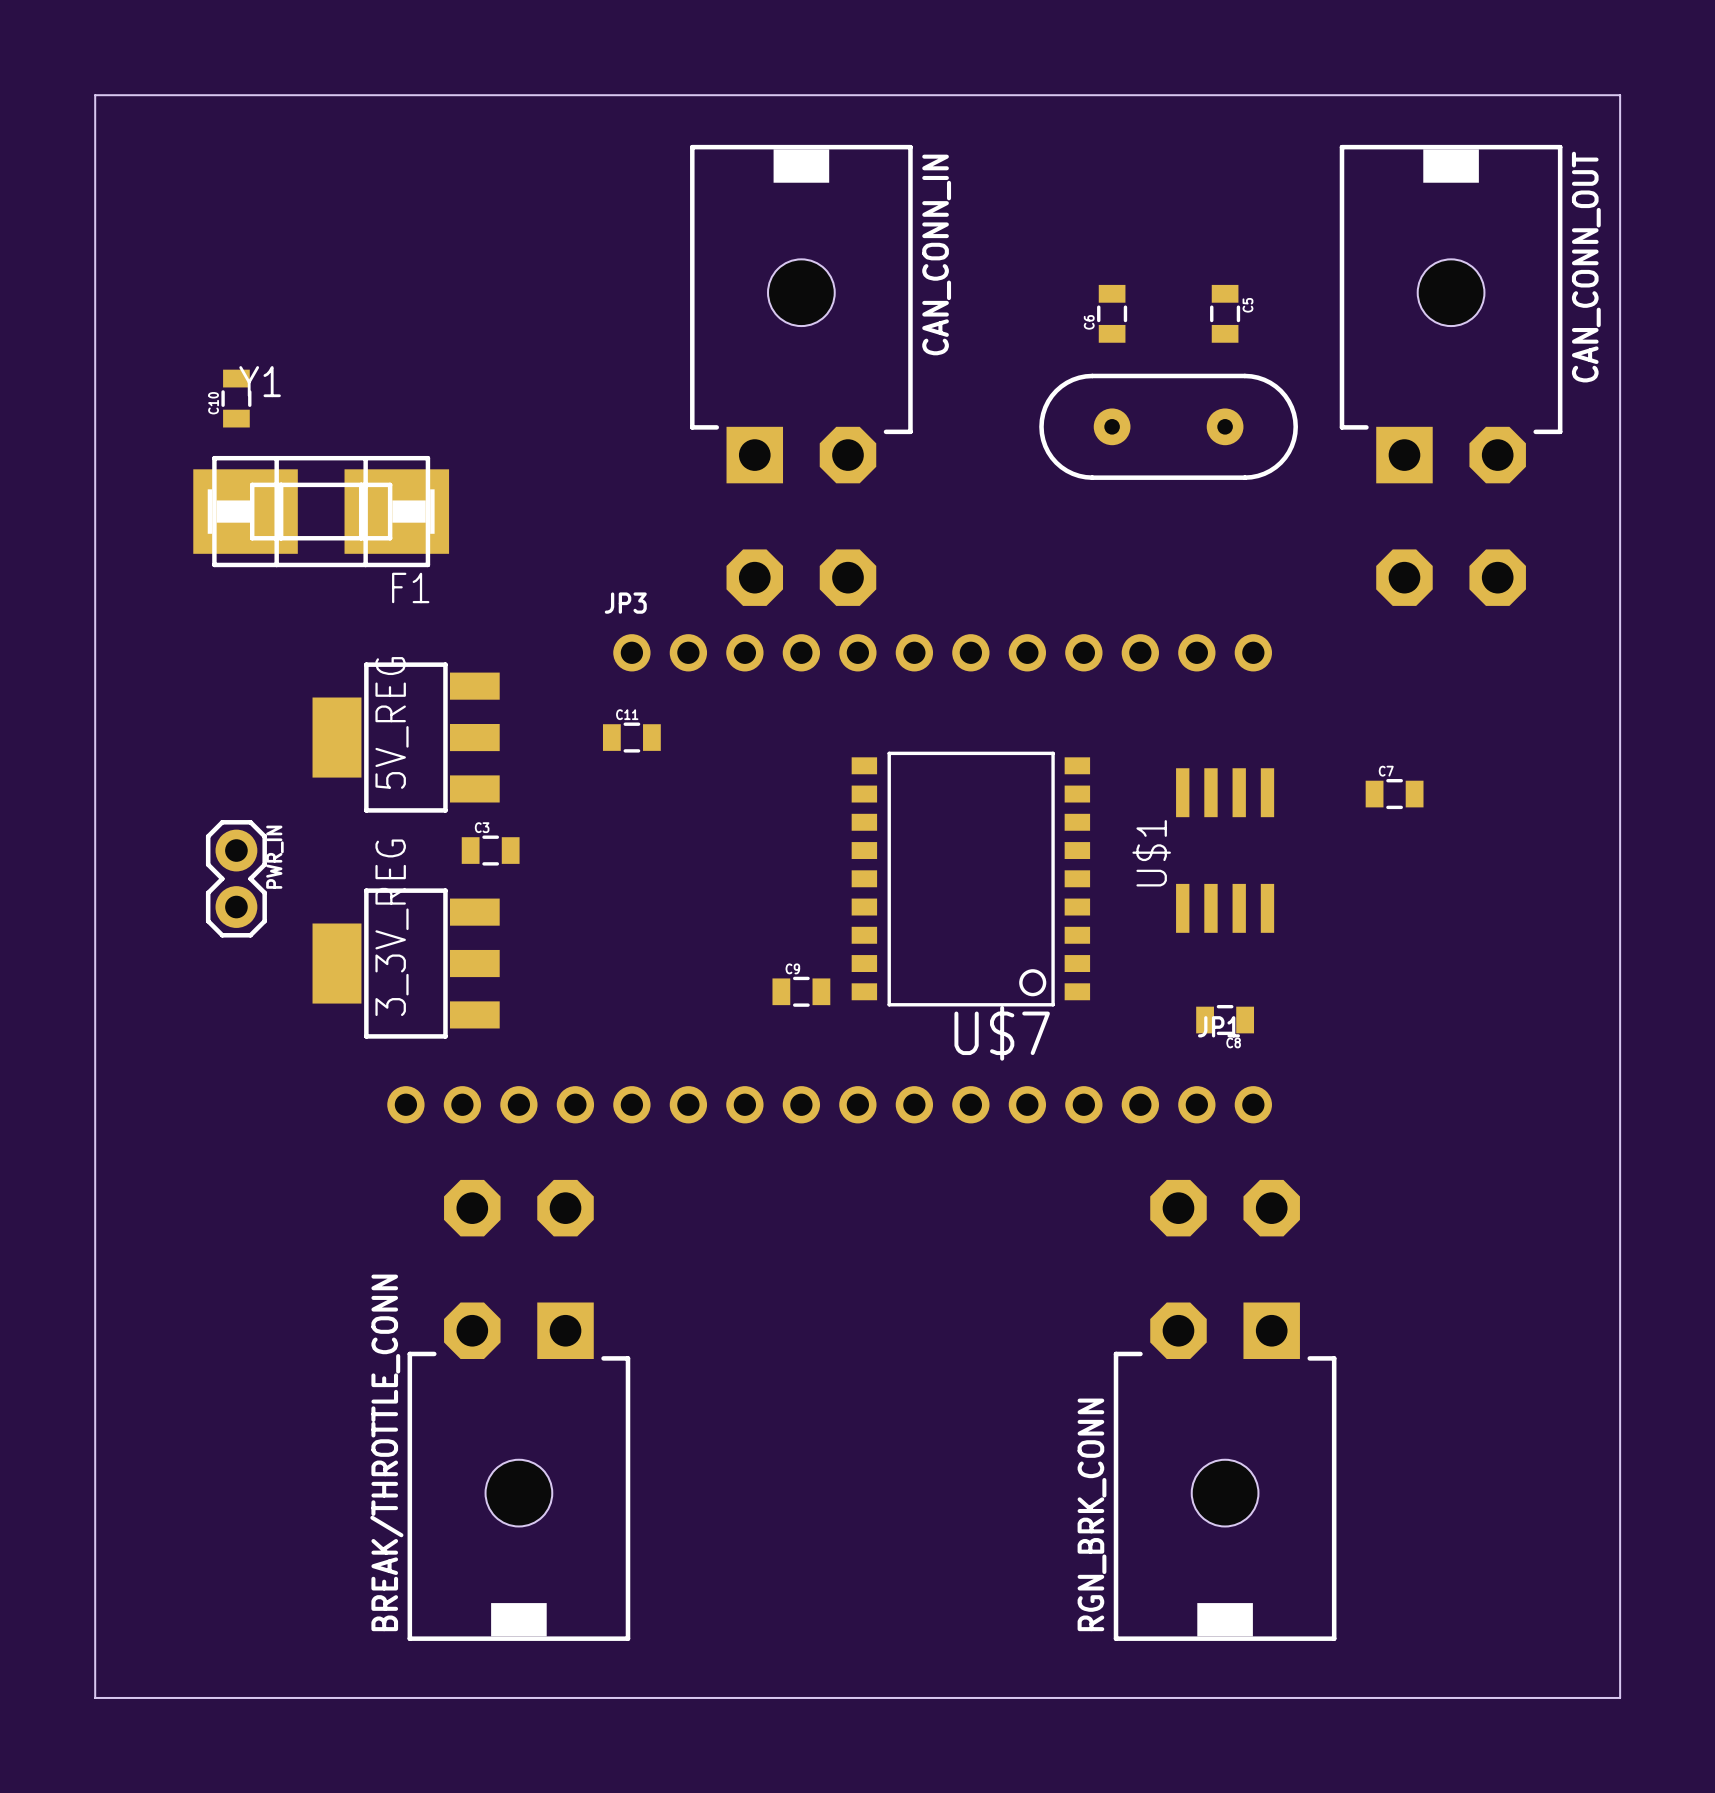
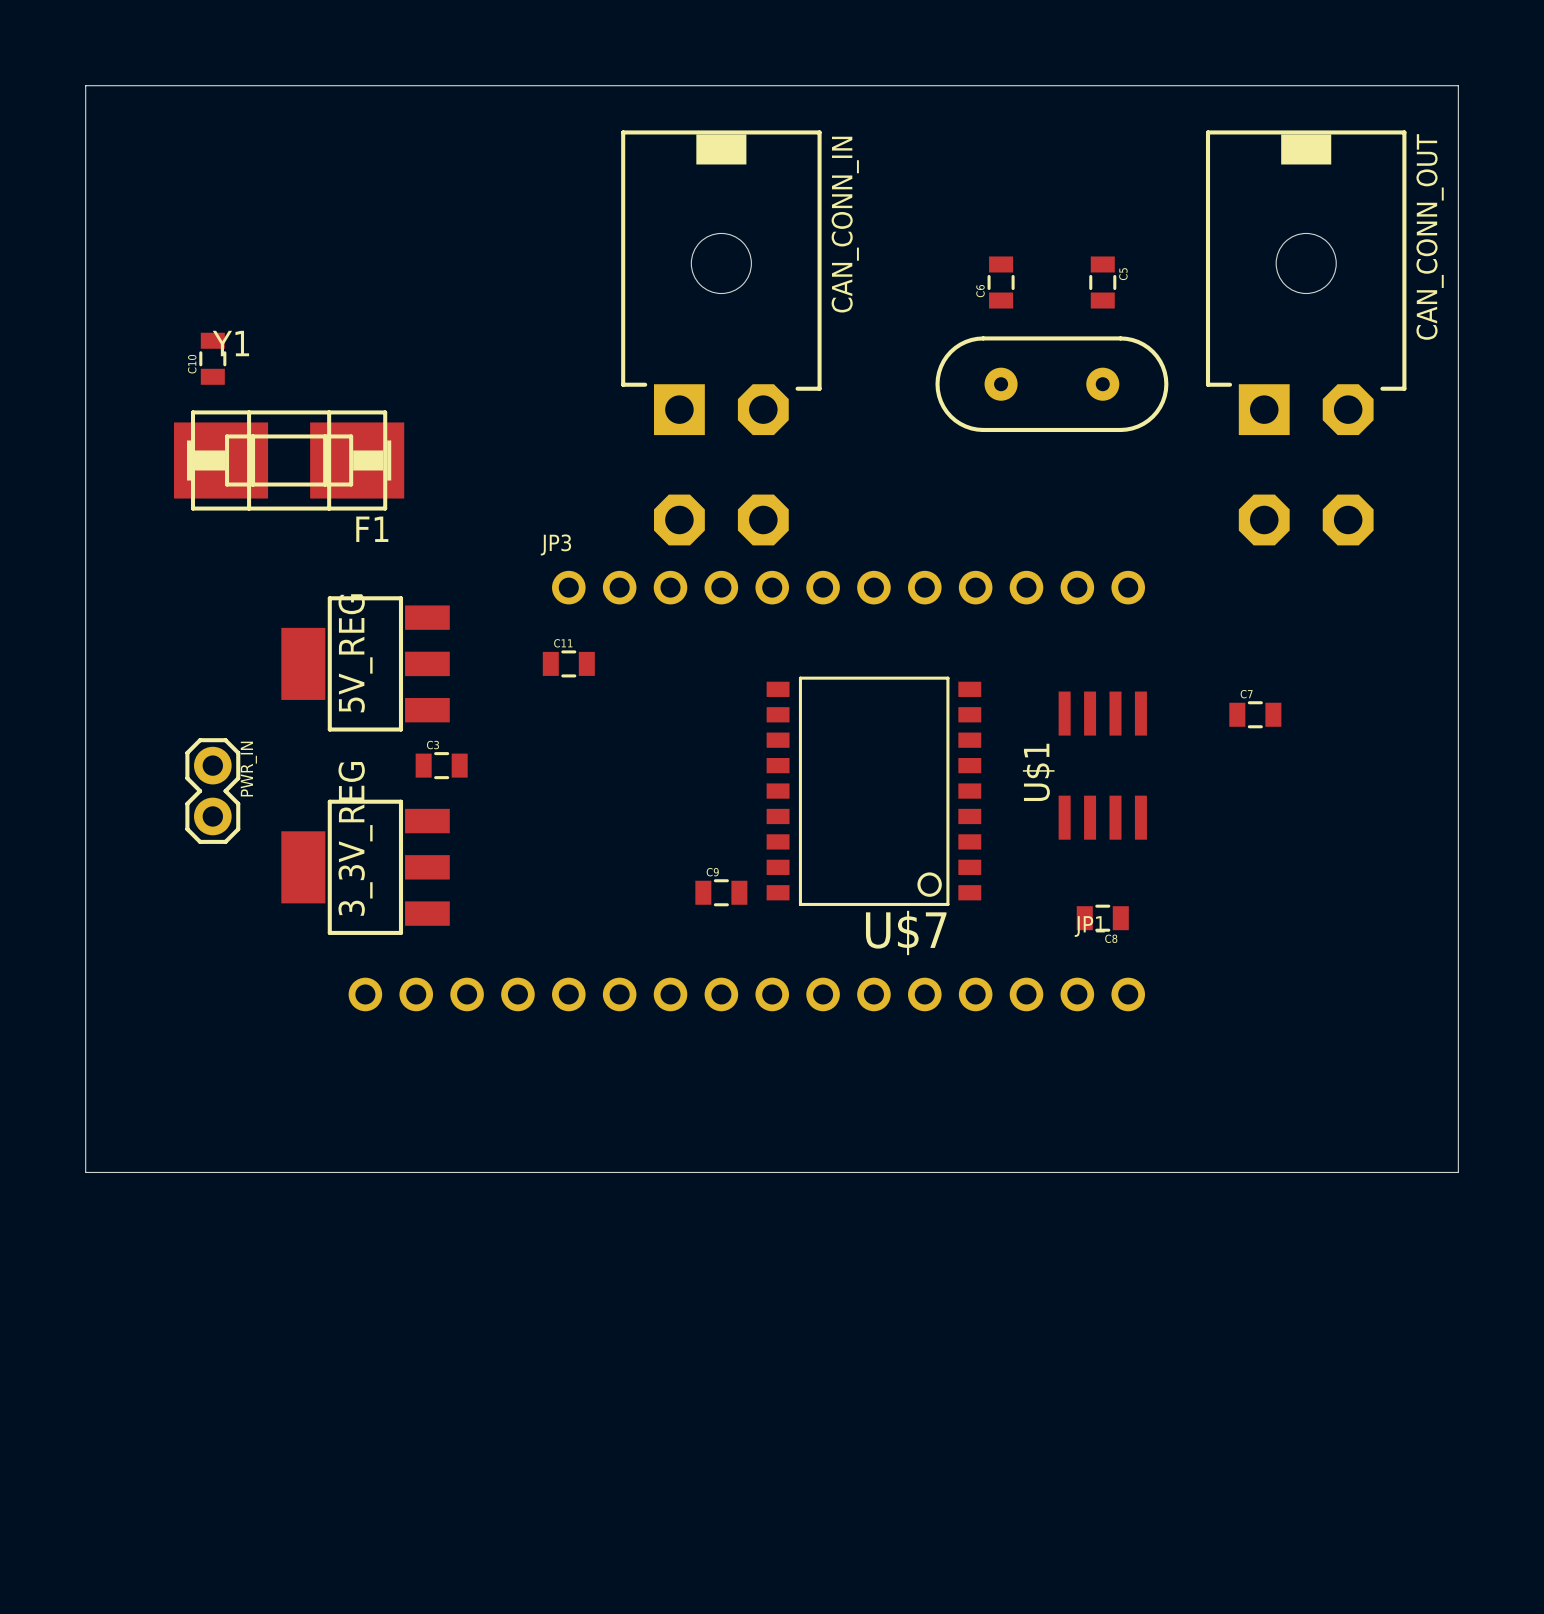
board edge: (95, 1302) (95, 1697) (1620, 1697) (1620, 1302) -> (85, 1172) (1458, 1172)
BREAK/THROTTLE_CONN: (518, 1410) -> none
RGN_BRK_CONN: (1225, 1410) -> none

